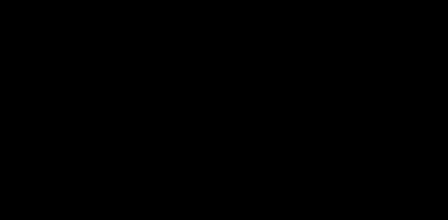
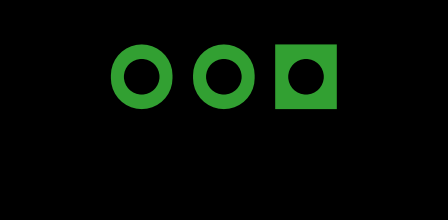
part: none -> (223, 76)

